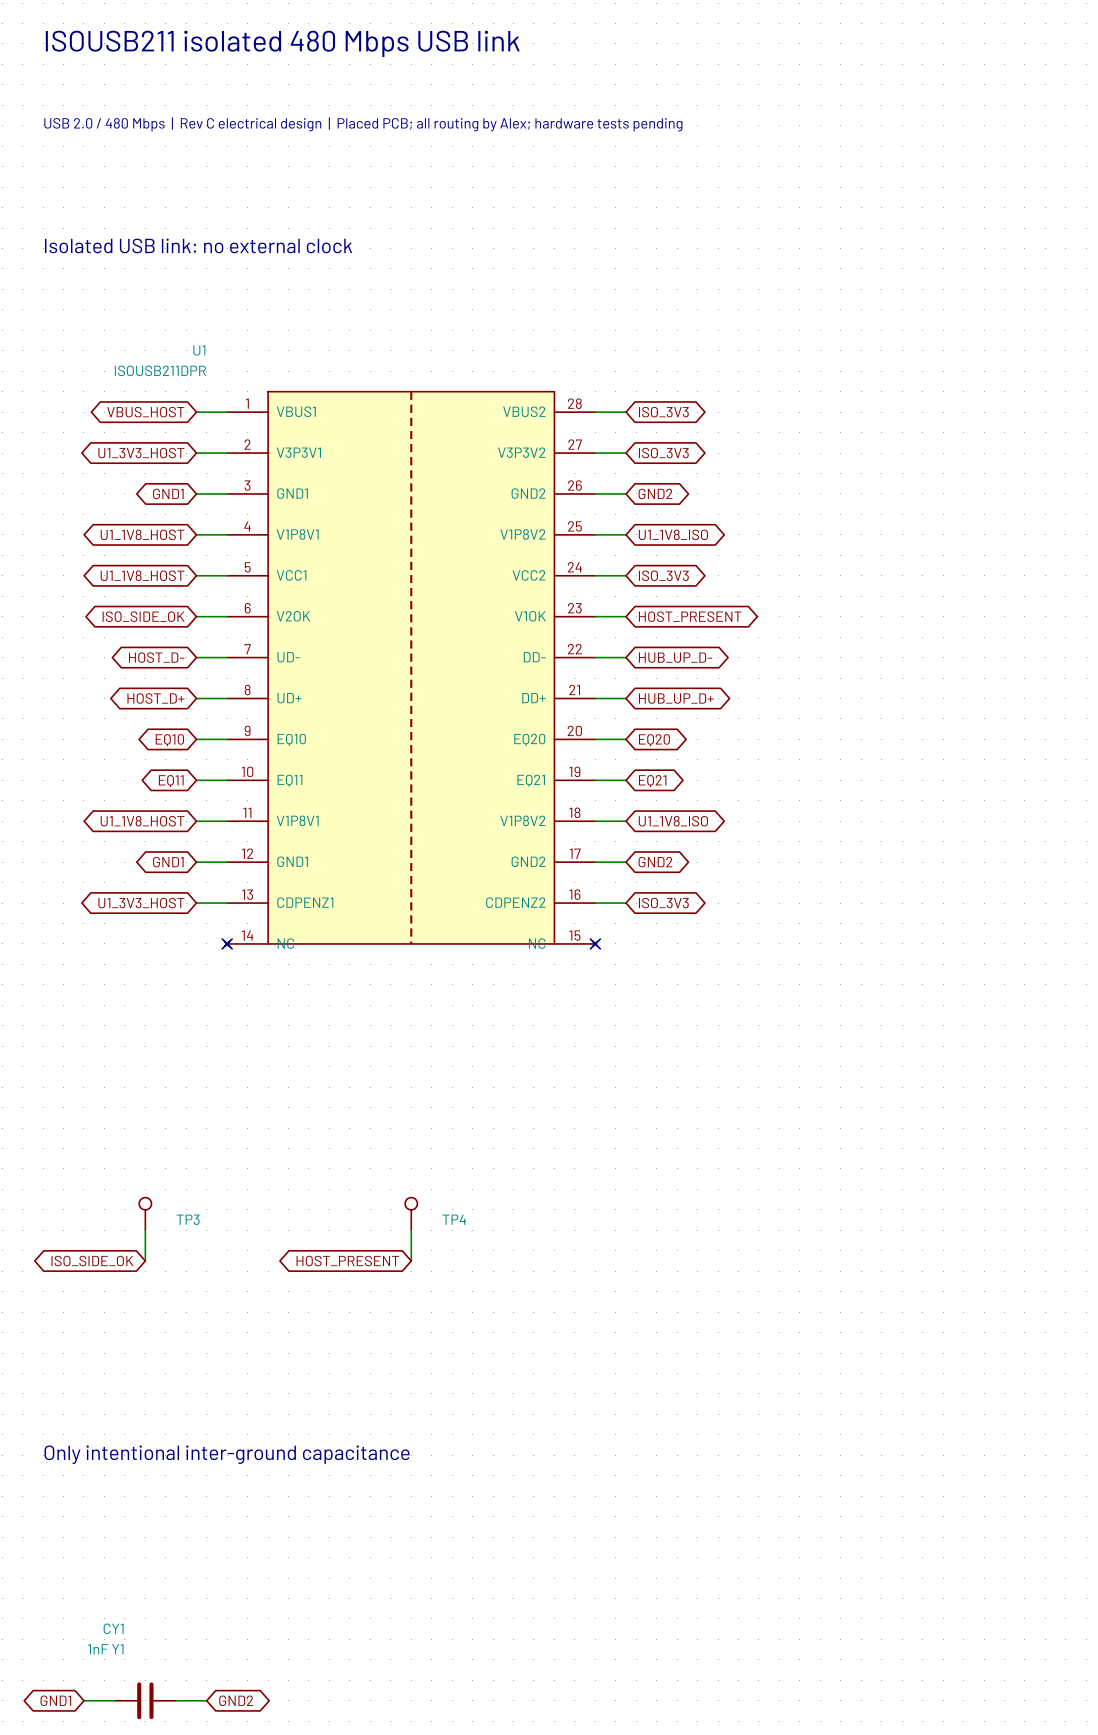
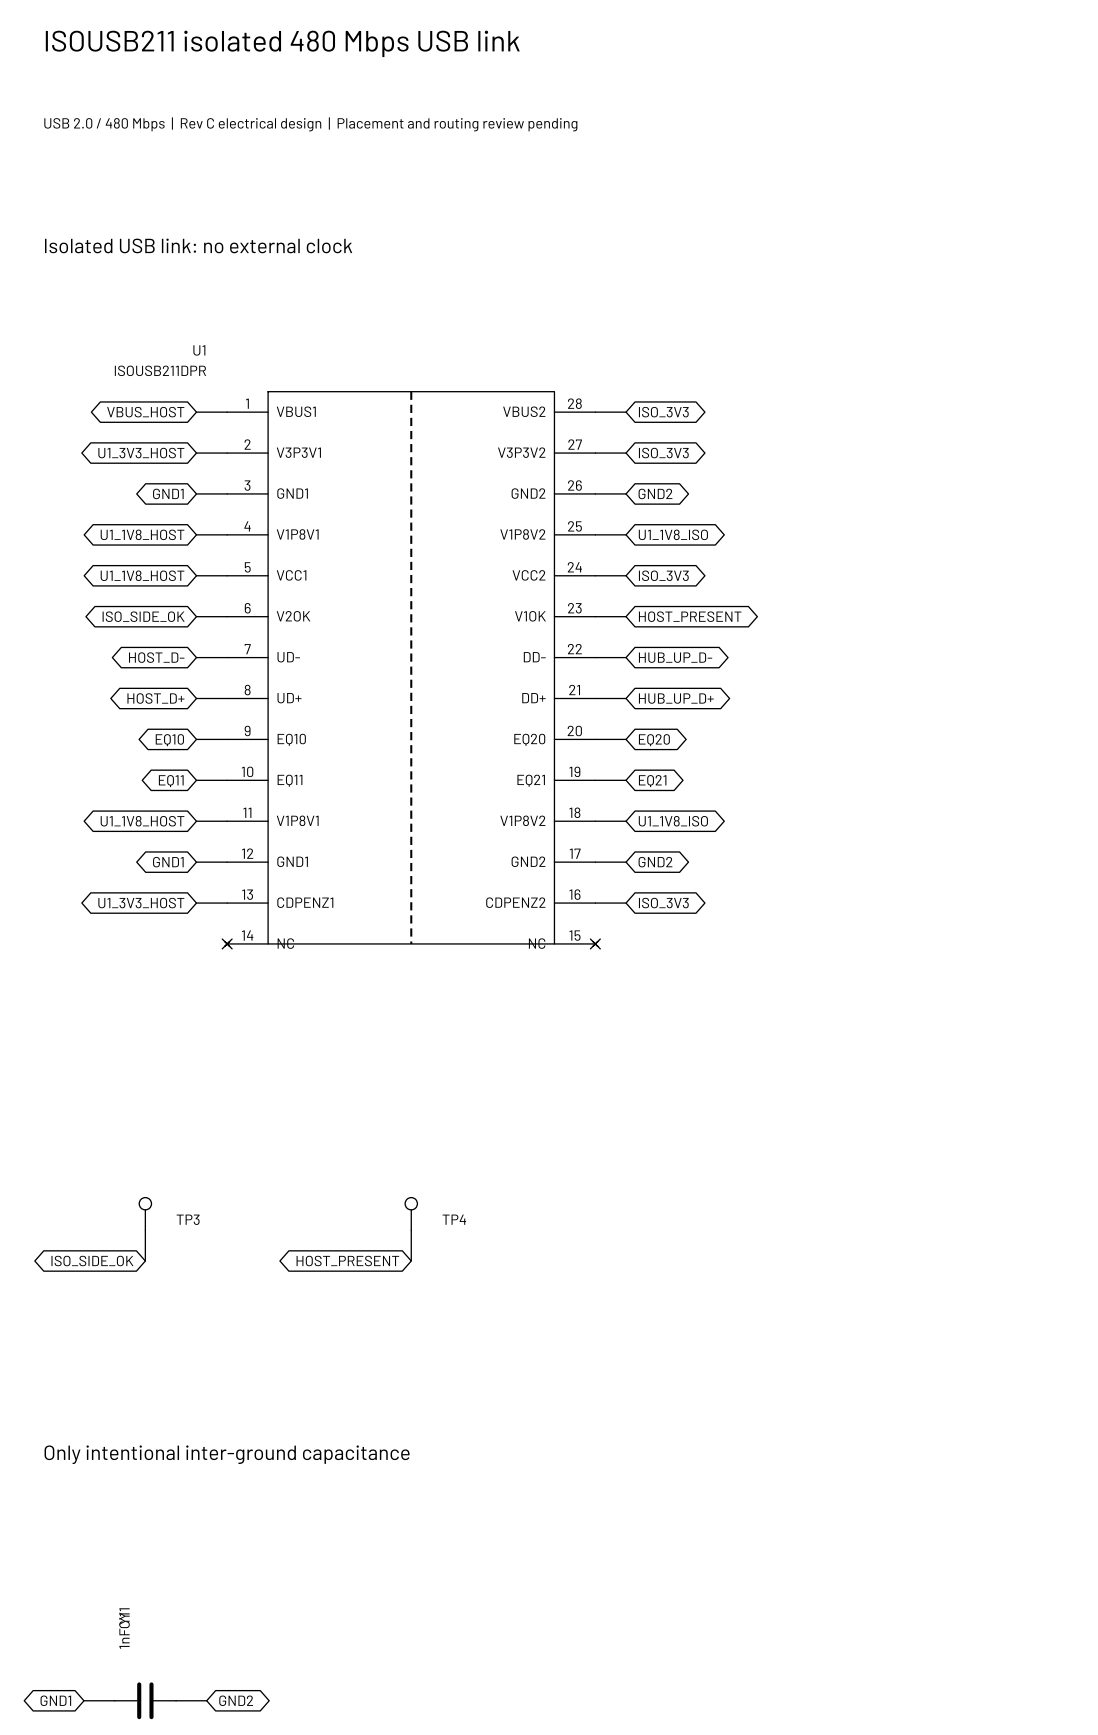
text: USB 2.0 / 480 Mbps | Rev C electrical design | Placed PCB; all routing by Alex; hardware tests pending (363, 124) -> USB 2.0 / 480 Mbps | Rev C electrical design | Placement and routing review pending (310, 124)
CY1 name rotation: 0° (113, 1628) -> 90° counterclockwise (124, 1618)
CY1 value rotation: 0° (105, 1649) -> 90° counterclockwise (124, 1631)

